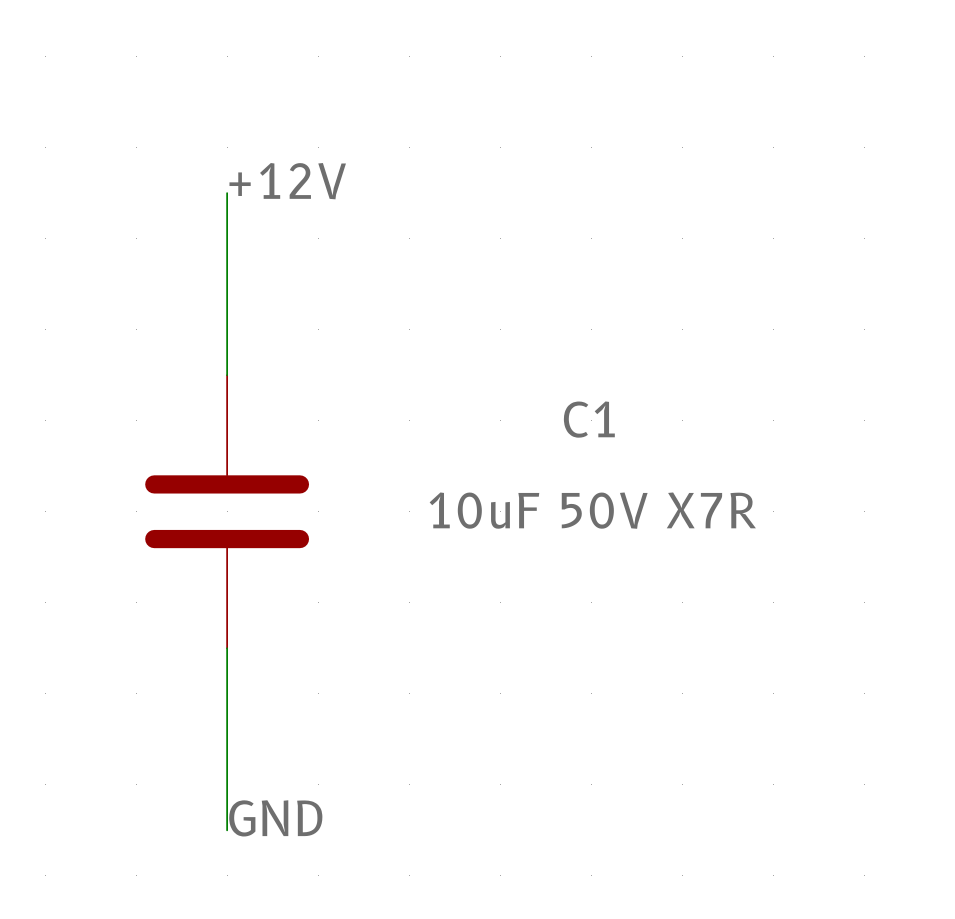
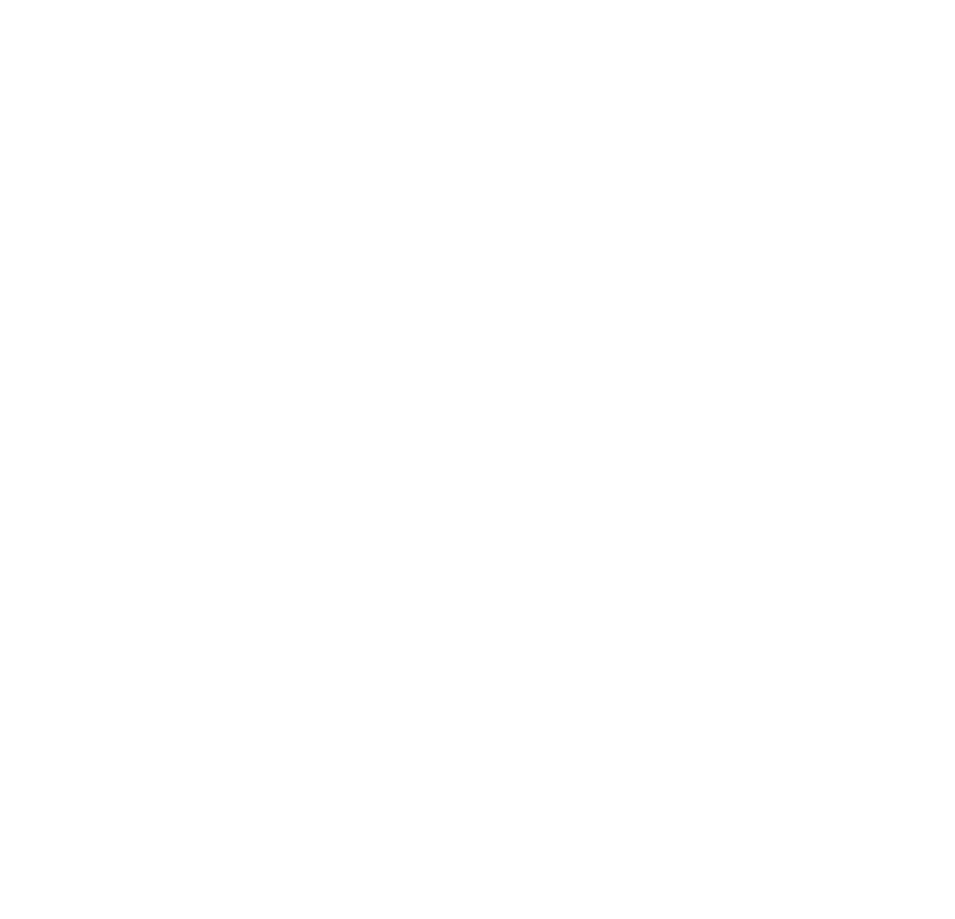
label: +12V (287, 181) -> none
wire: (227, 193) (227, 375) -> none
C1: 10uF 50V X7R (227, 511) -> none
wire: (227, 648) (227, 830) -> none
label: GND (275, 818) -> none

